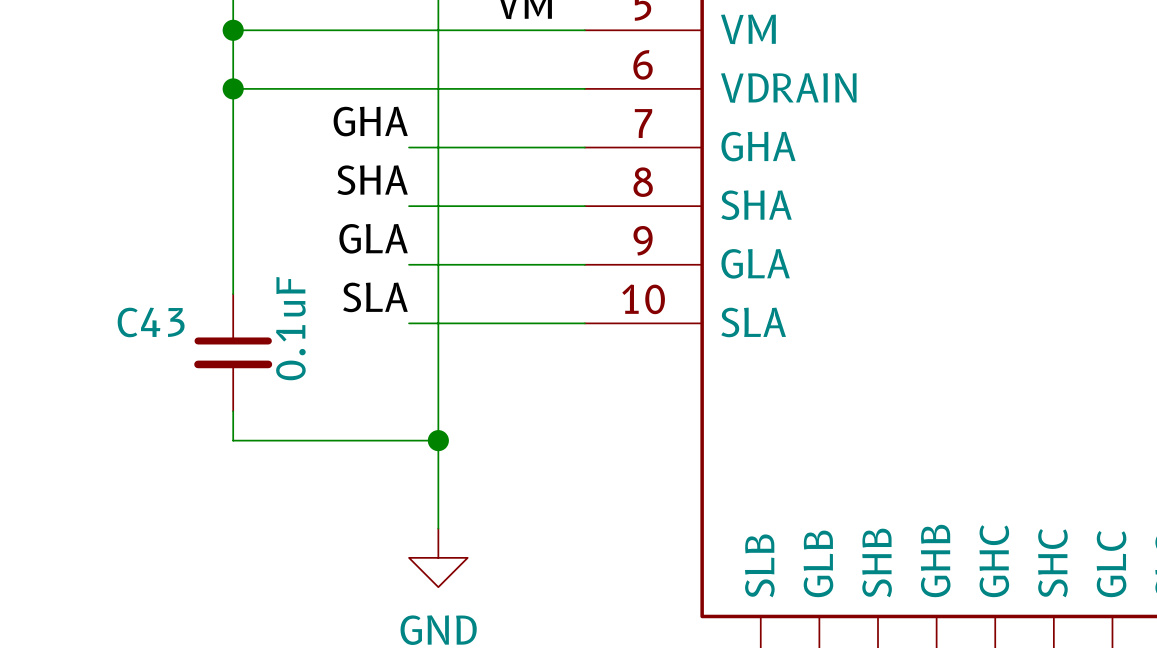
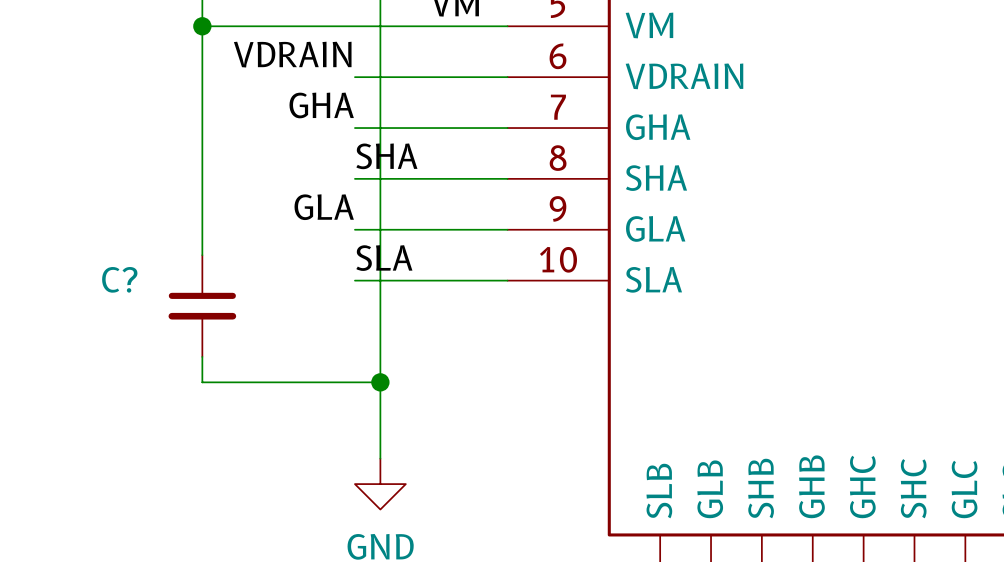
label: none -> VDRAIN (292, 54)
wire: (233, 88) (409, 88) -> none
junction: (233, 88) -> none
label position: SHA (372, 180) -> SHA (386, 156)
label position: SLA (375, 297) -> SLA (384, 258)
C43 name: C43 (151, 322) -> C? (119, 279)
C43 value: 0.1uF (290, 328) -> none

